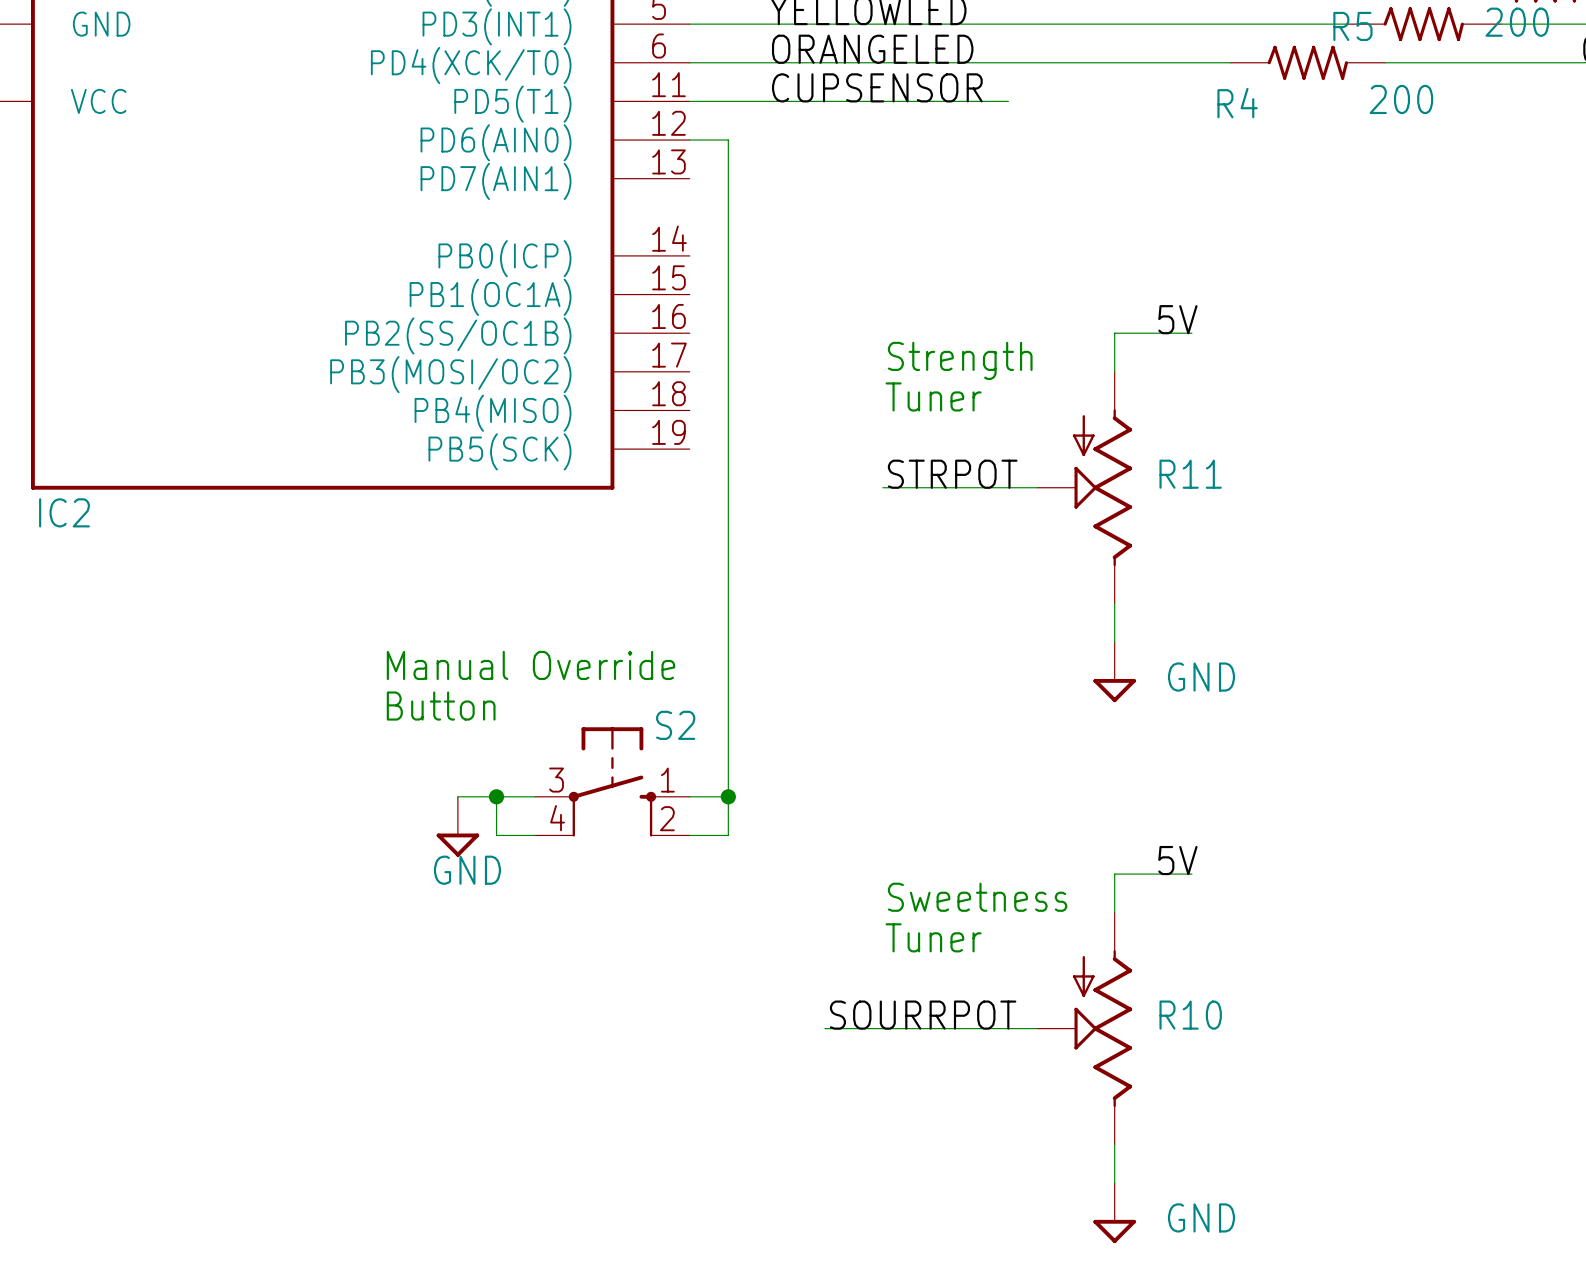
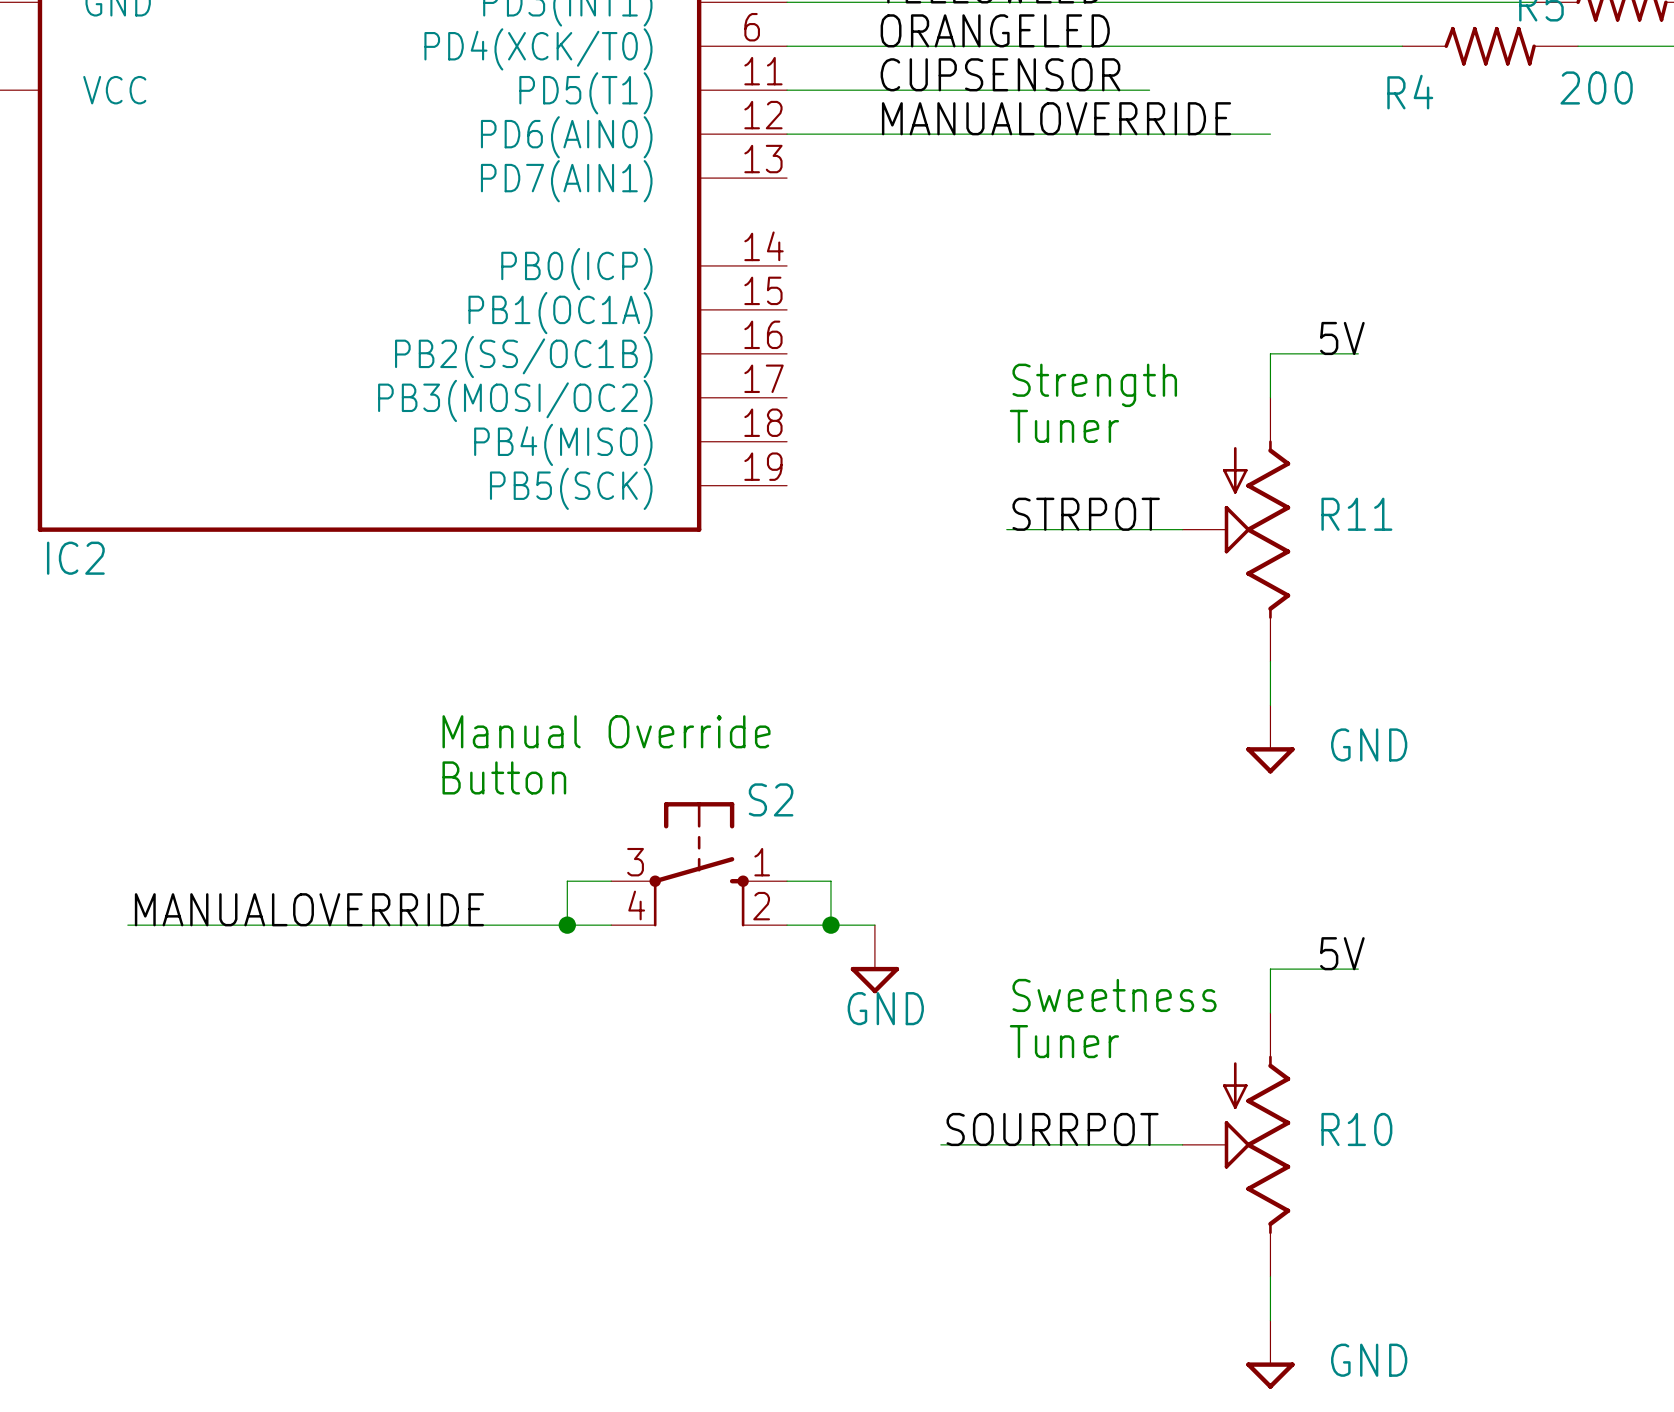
label: none -> MANUALOVERRIDE (1056, 118)
wire: (728, 140) (728, 796) -> (830, 134) (1270, 134)
wire: (457, 796) (496, 796) -> (830, 925) (874, 925)
junction position: (496, 796) -> (567, 925)
junction position: (728, 796) -> (830, 925)
label: none -> MANUALOVERRIDE (309, 909)
power symbol position: GND (457, 826) -> GND (874, 959)
wire: none -> (127, 925) (567, 925)

